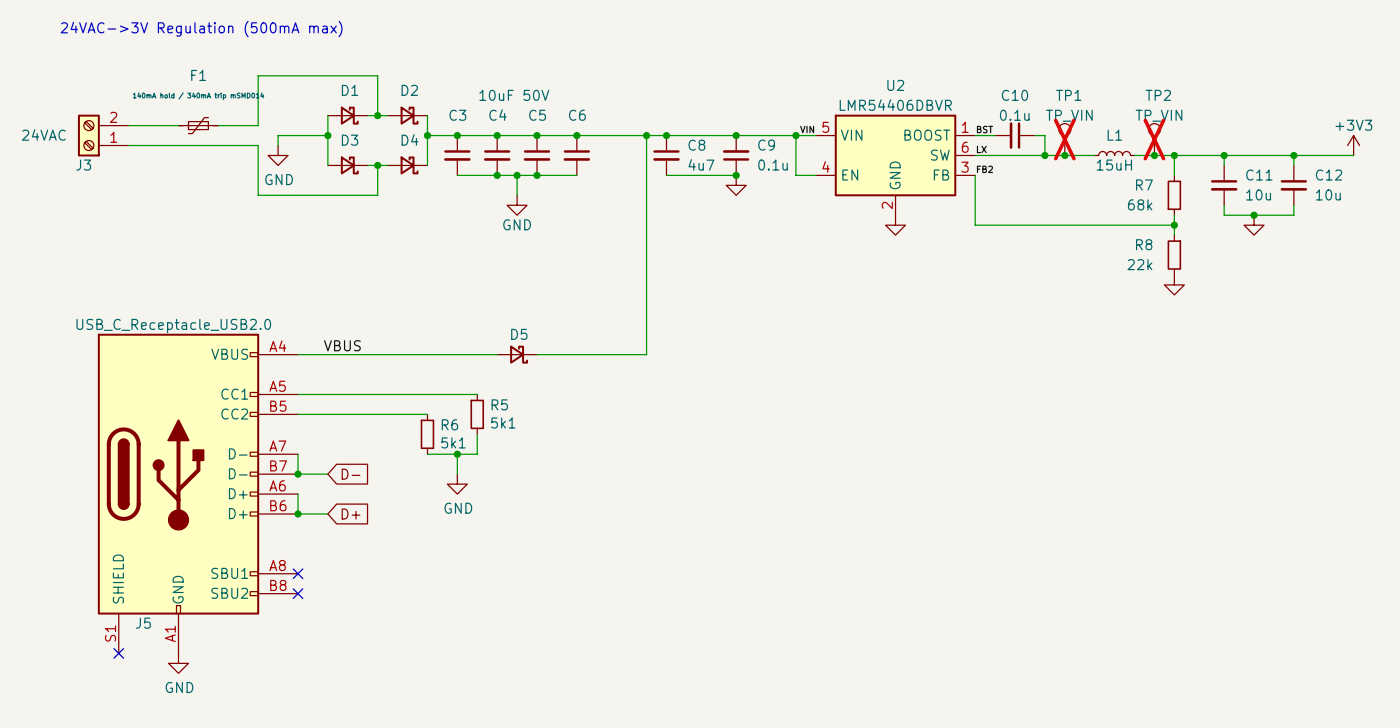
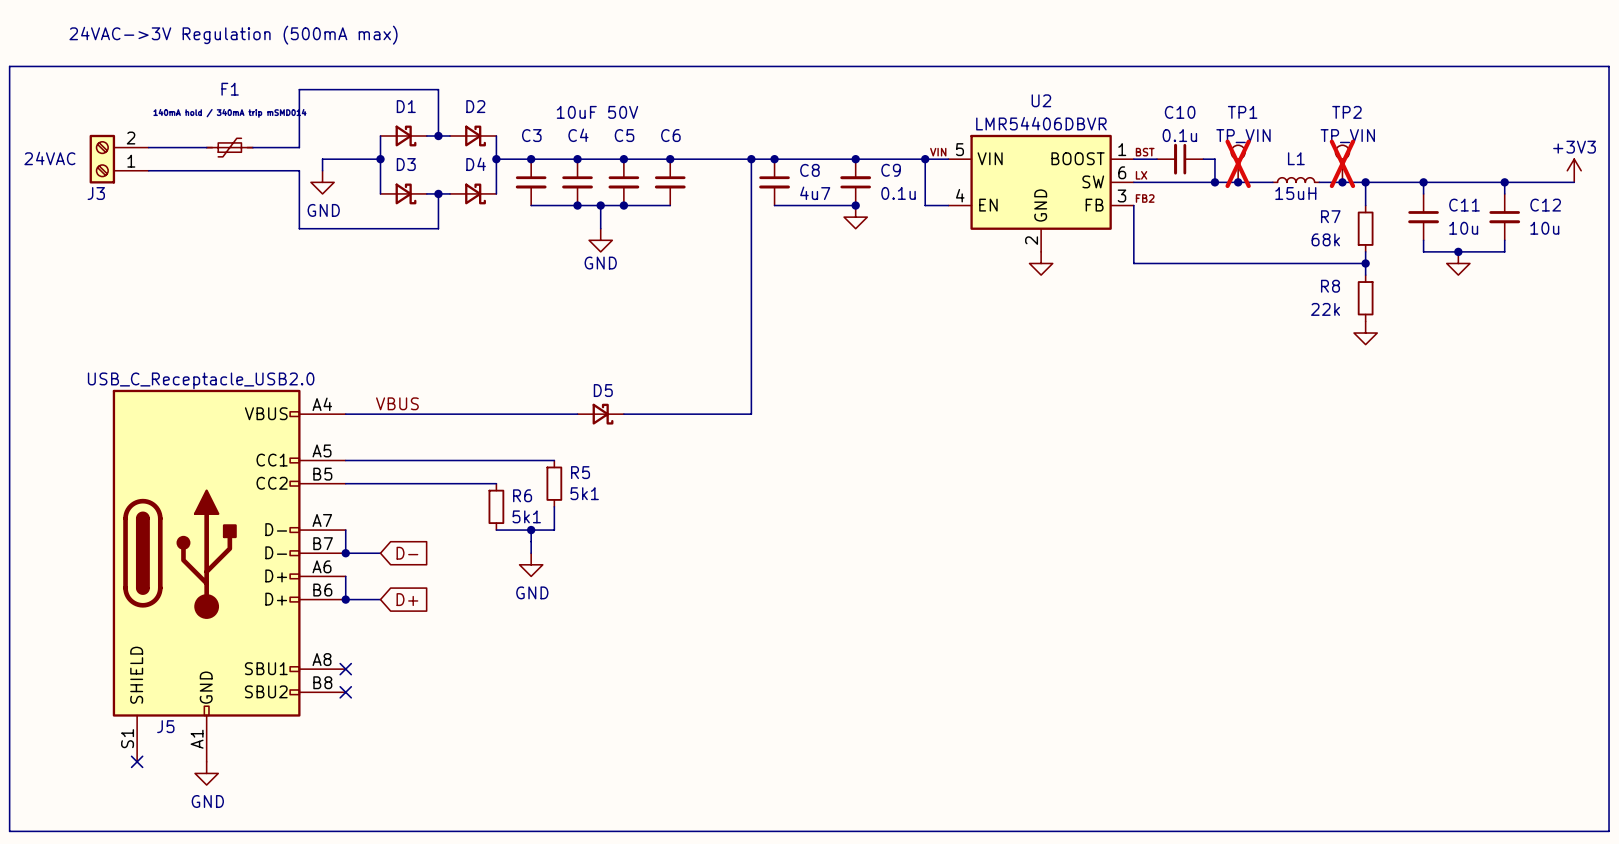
line: none -> (9, 66) (1609, 66) (1609, 831) (9, 831) (9, 66)

